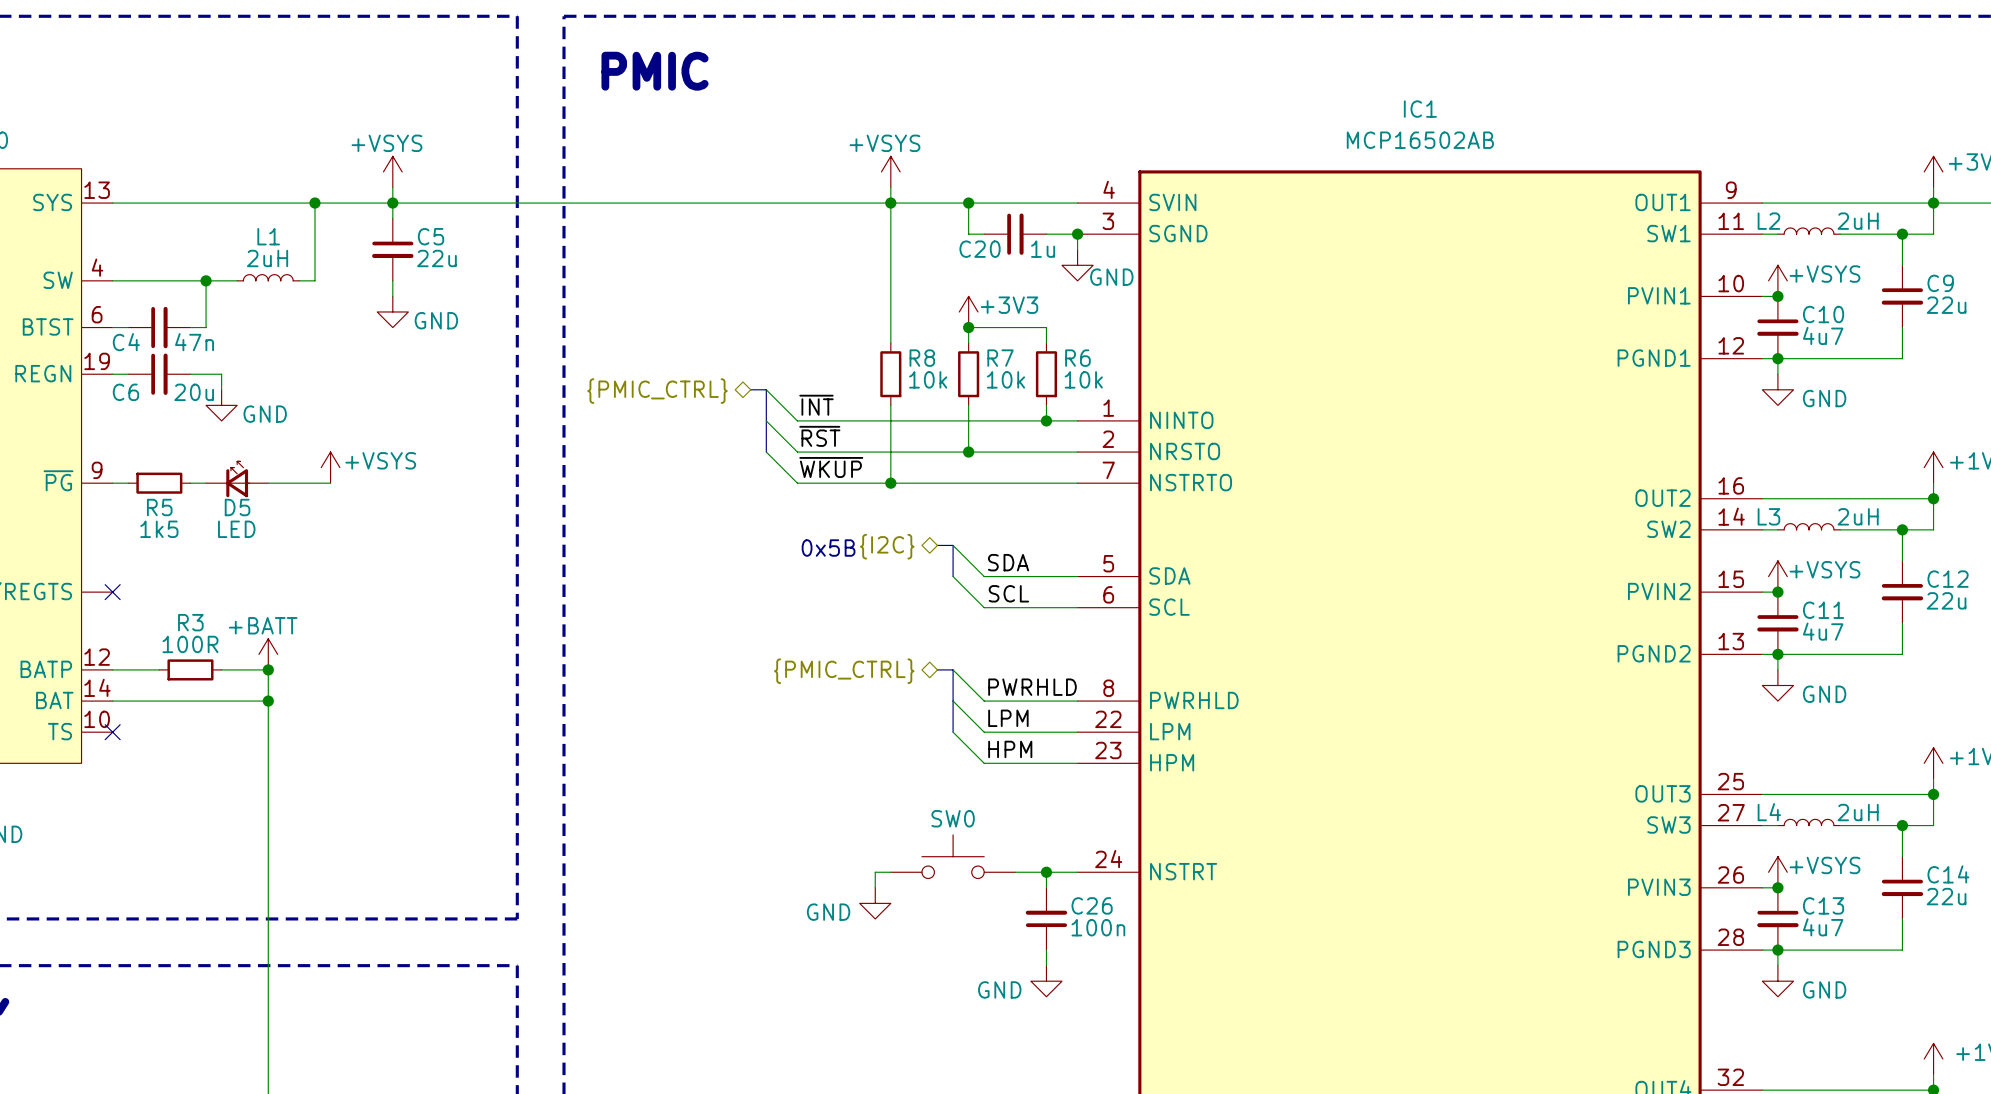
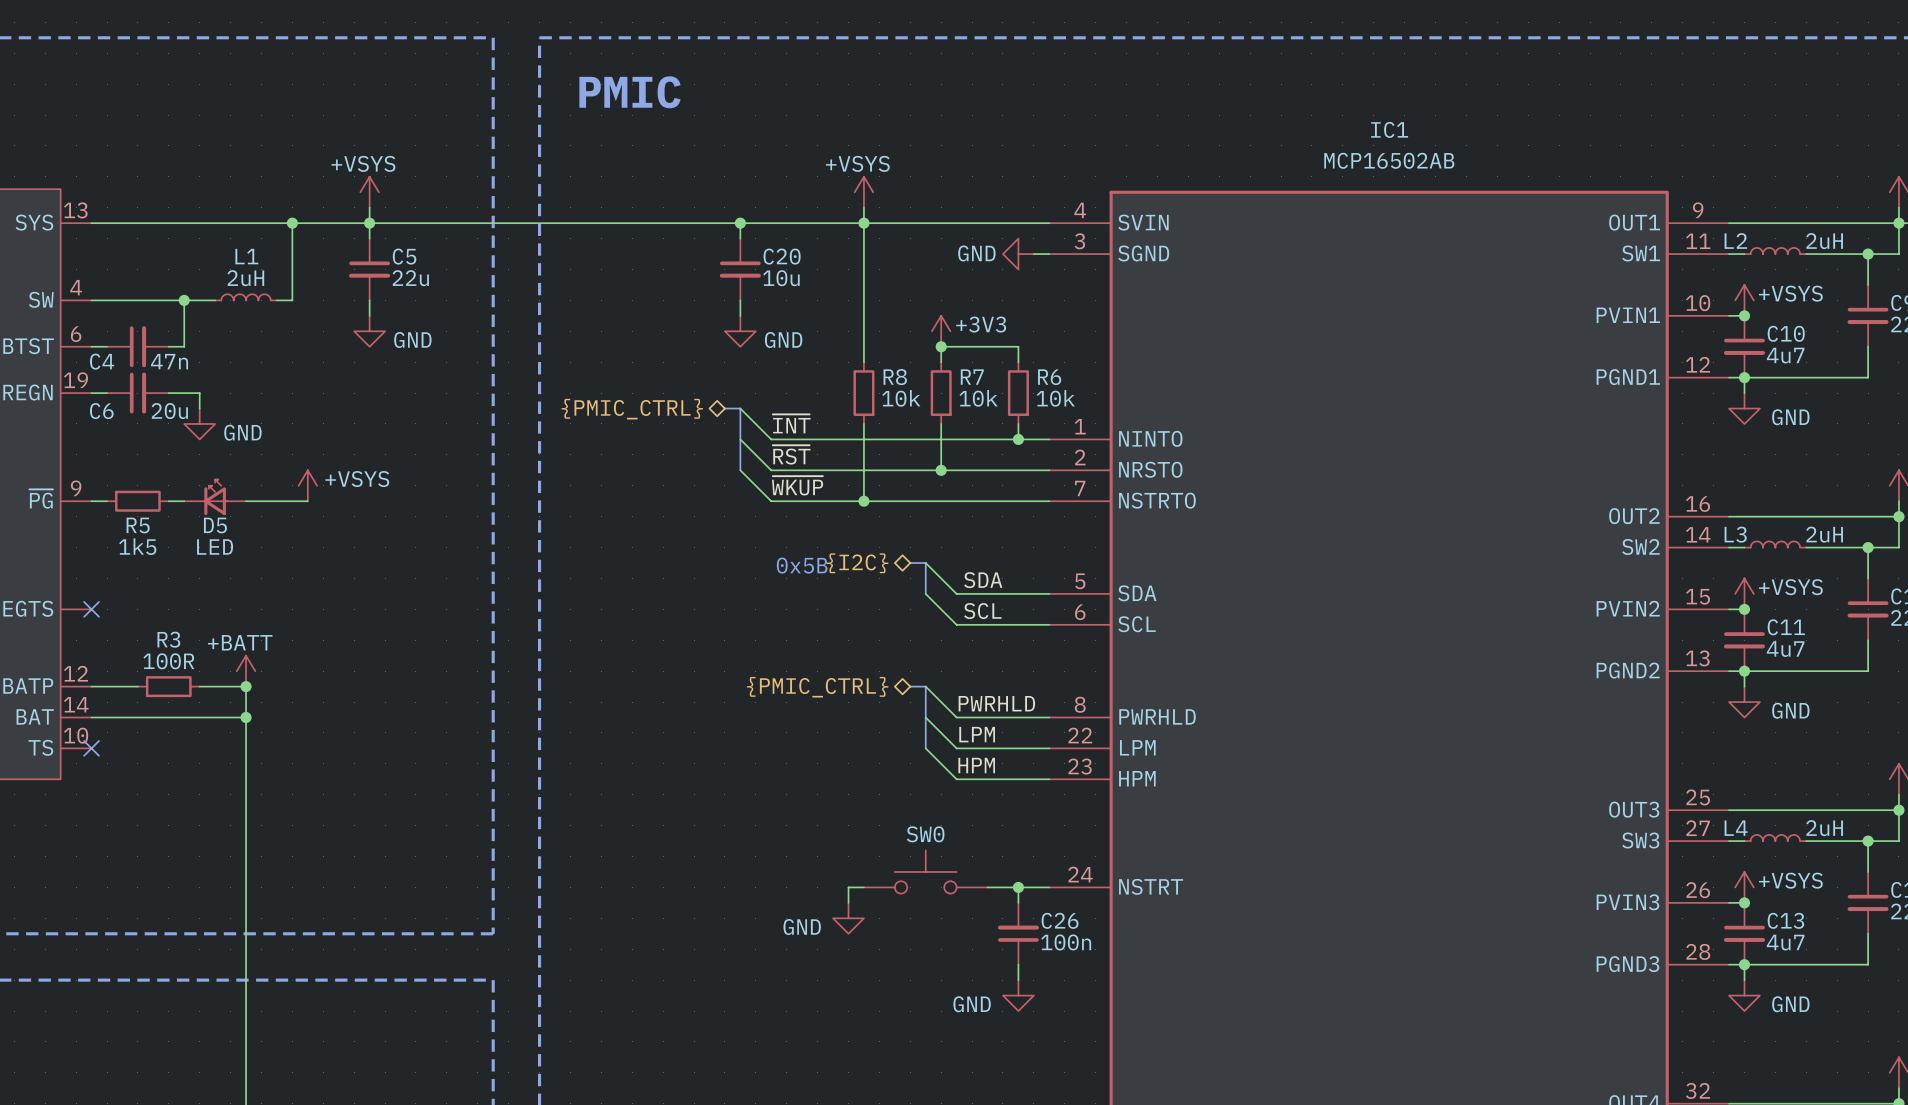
wire: none -> (740, 223) (740, 238)
junction: none -> (740, 223)
wire: (968, 203) (968, 234) (984, 234) -> none
junction: (968, 203) -> none
C20 rotation: 0° (1015, 234) -> 90° clockwise (740, 269)
C20 position: (1015, 234) -> (740, 269)
wire: (1077, 234) (1077, 249) -> none
junction: (1077, 234) -> none
C20 name position: C20 (980, 249) -> C20 (782, 256)
C20 value: 1u (1043, 249) -> 10u (781, 278)
power symbol rotation: 0° (1077, 265) -> 90° clockwise (1018, 254)
power symbol position: GND (1077, 265) -> GND (1018, 254)
power symbol text position: GND (1111, 277) -> GND (976, 253)
wire: none -> (740, 300) (740, 315)
power symbol: none -> GND (740, 331)

